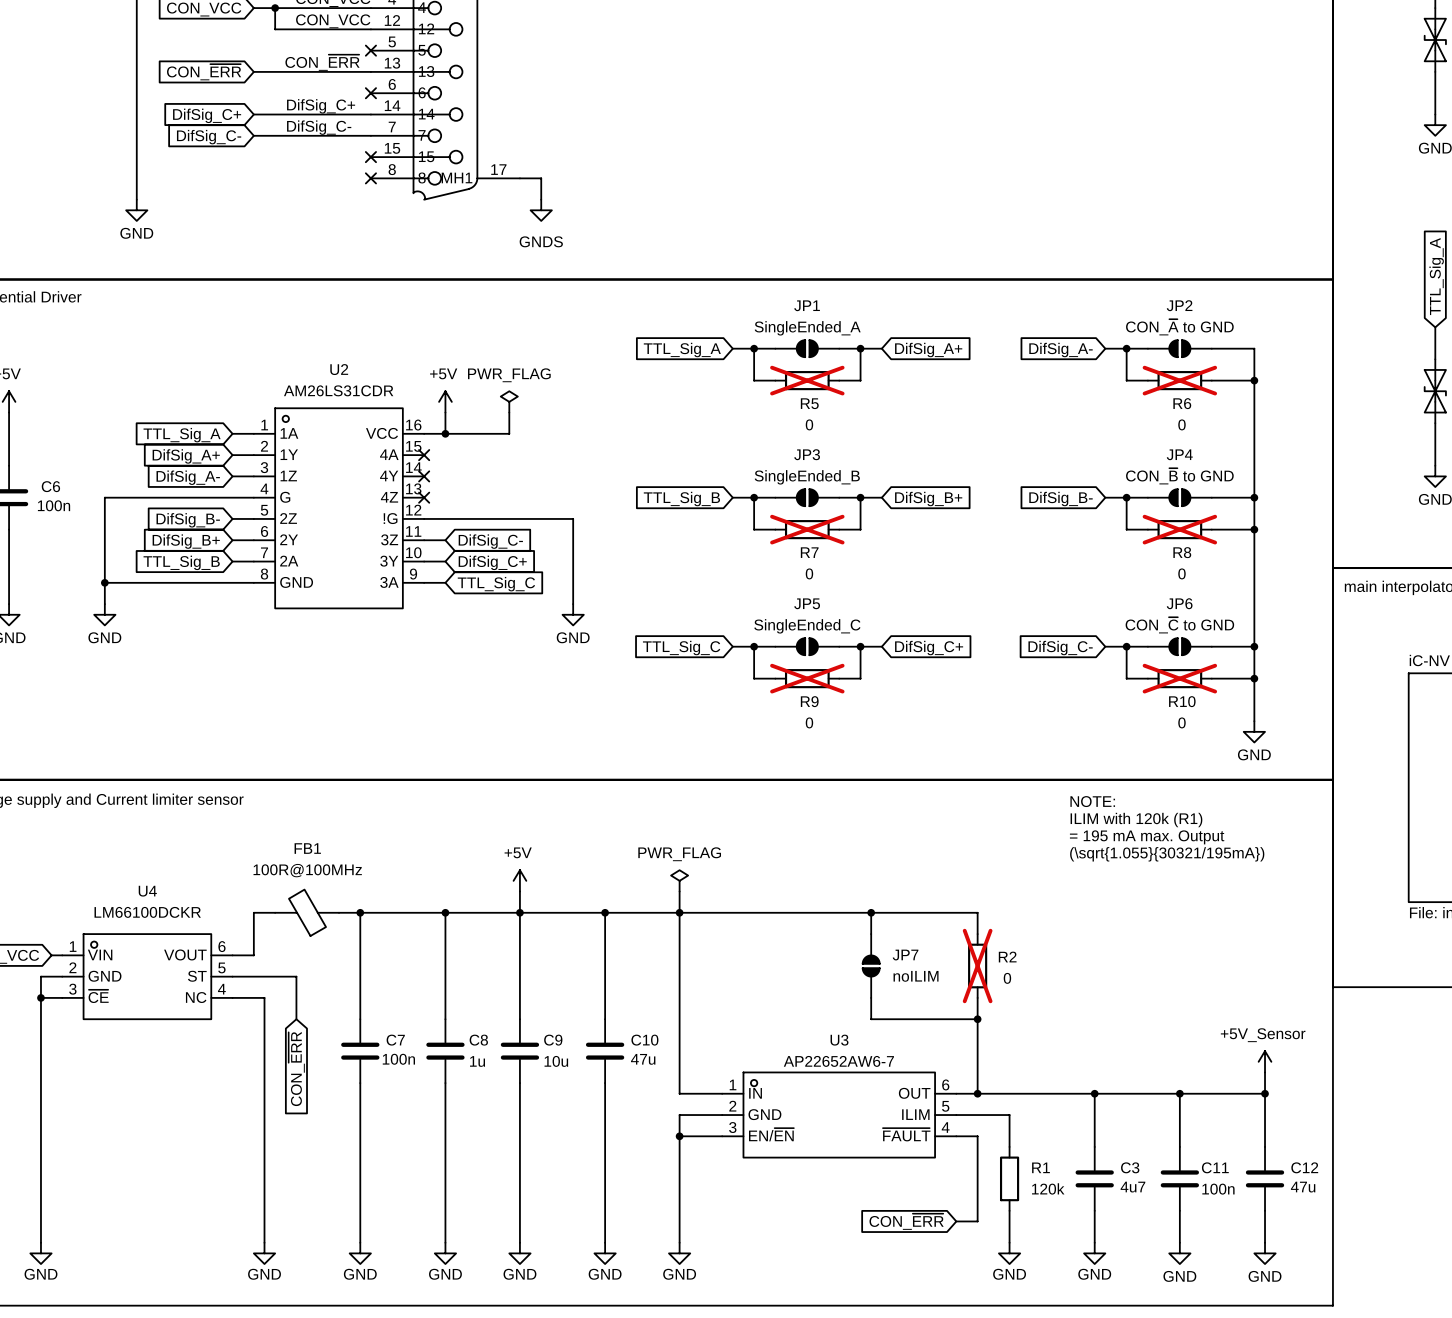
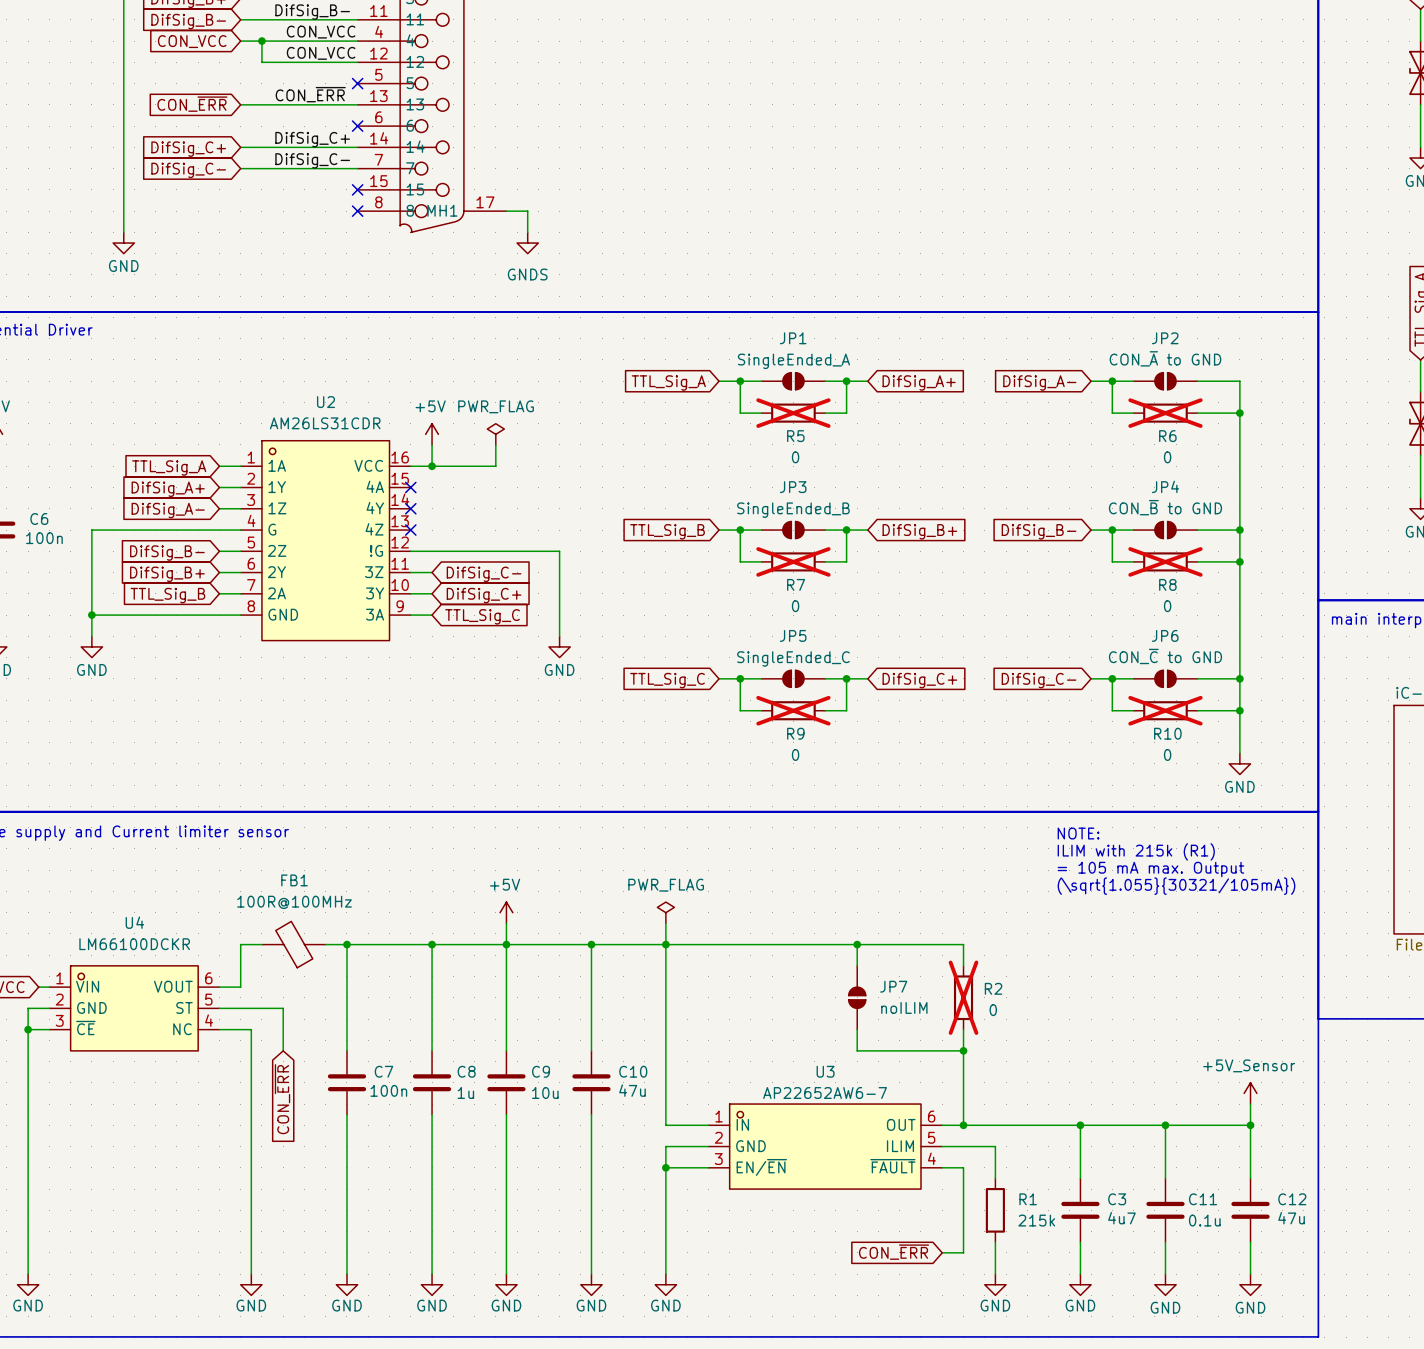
text: ILIM with 120k (R1) (1136, 820) -> ILIM with 215k (R1) (1136, 851)
text: = 195 mA max. Output (1147, 837) -> = 105 mA max. Output (1150, 869)
text: (\sqrt{1.055}{30321/195mA}) (1167, 854) -> (\sqrt{1.055}{30321/105mA}) (1176, 886)
R1 value: 120k (1048, 1188) -> 215k (1036, 1220)
C11 value: 100n (1218, 1189) -> 0.1u (1204, 1220)

